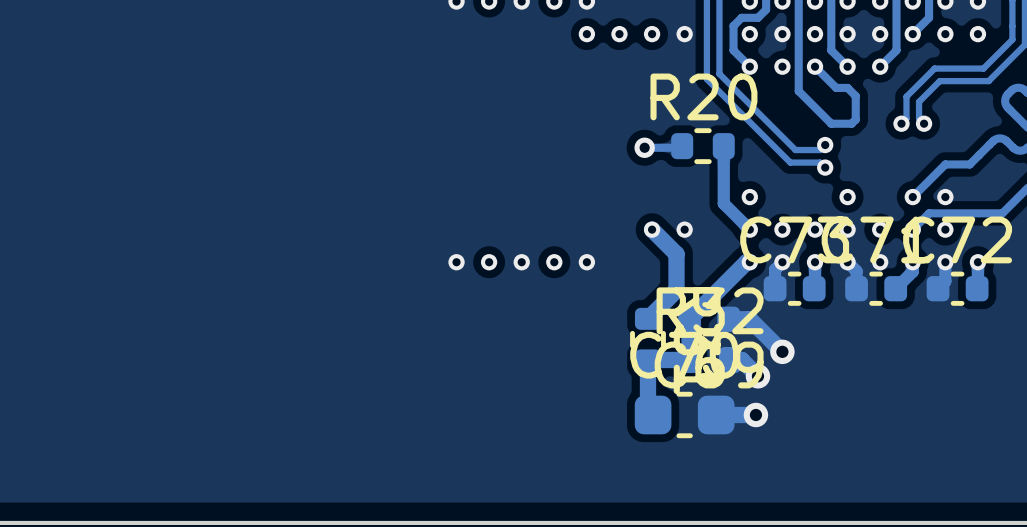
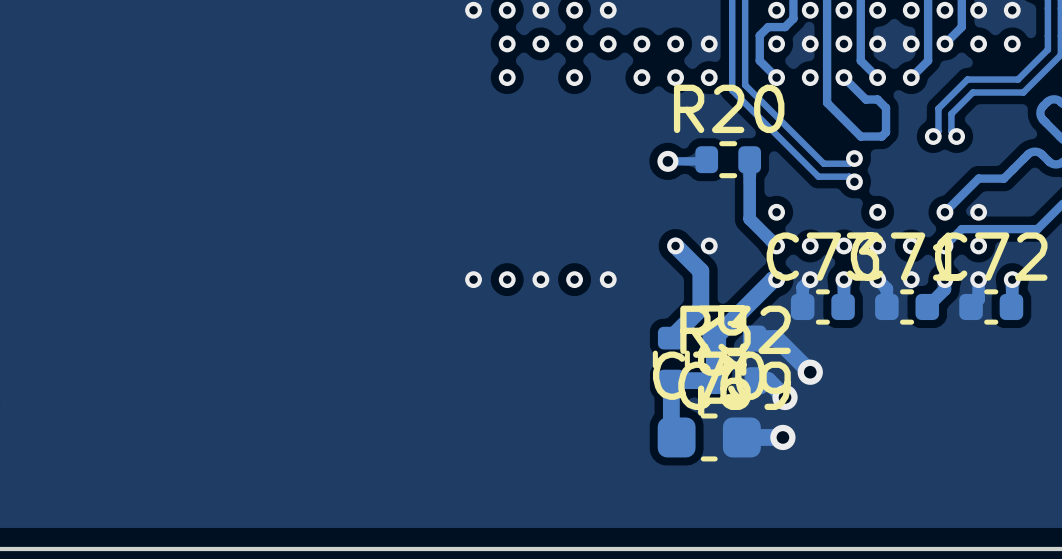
via: none -> (507, 43)
via: none -> (540, 43)
via: none -> (574, 43)
via: none -> (507, 77)
via: none -> (574, 77)
via: none -> (641, 77)
via: none -> (675, 77)
via: none -> (709, 77)

